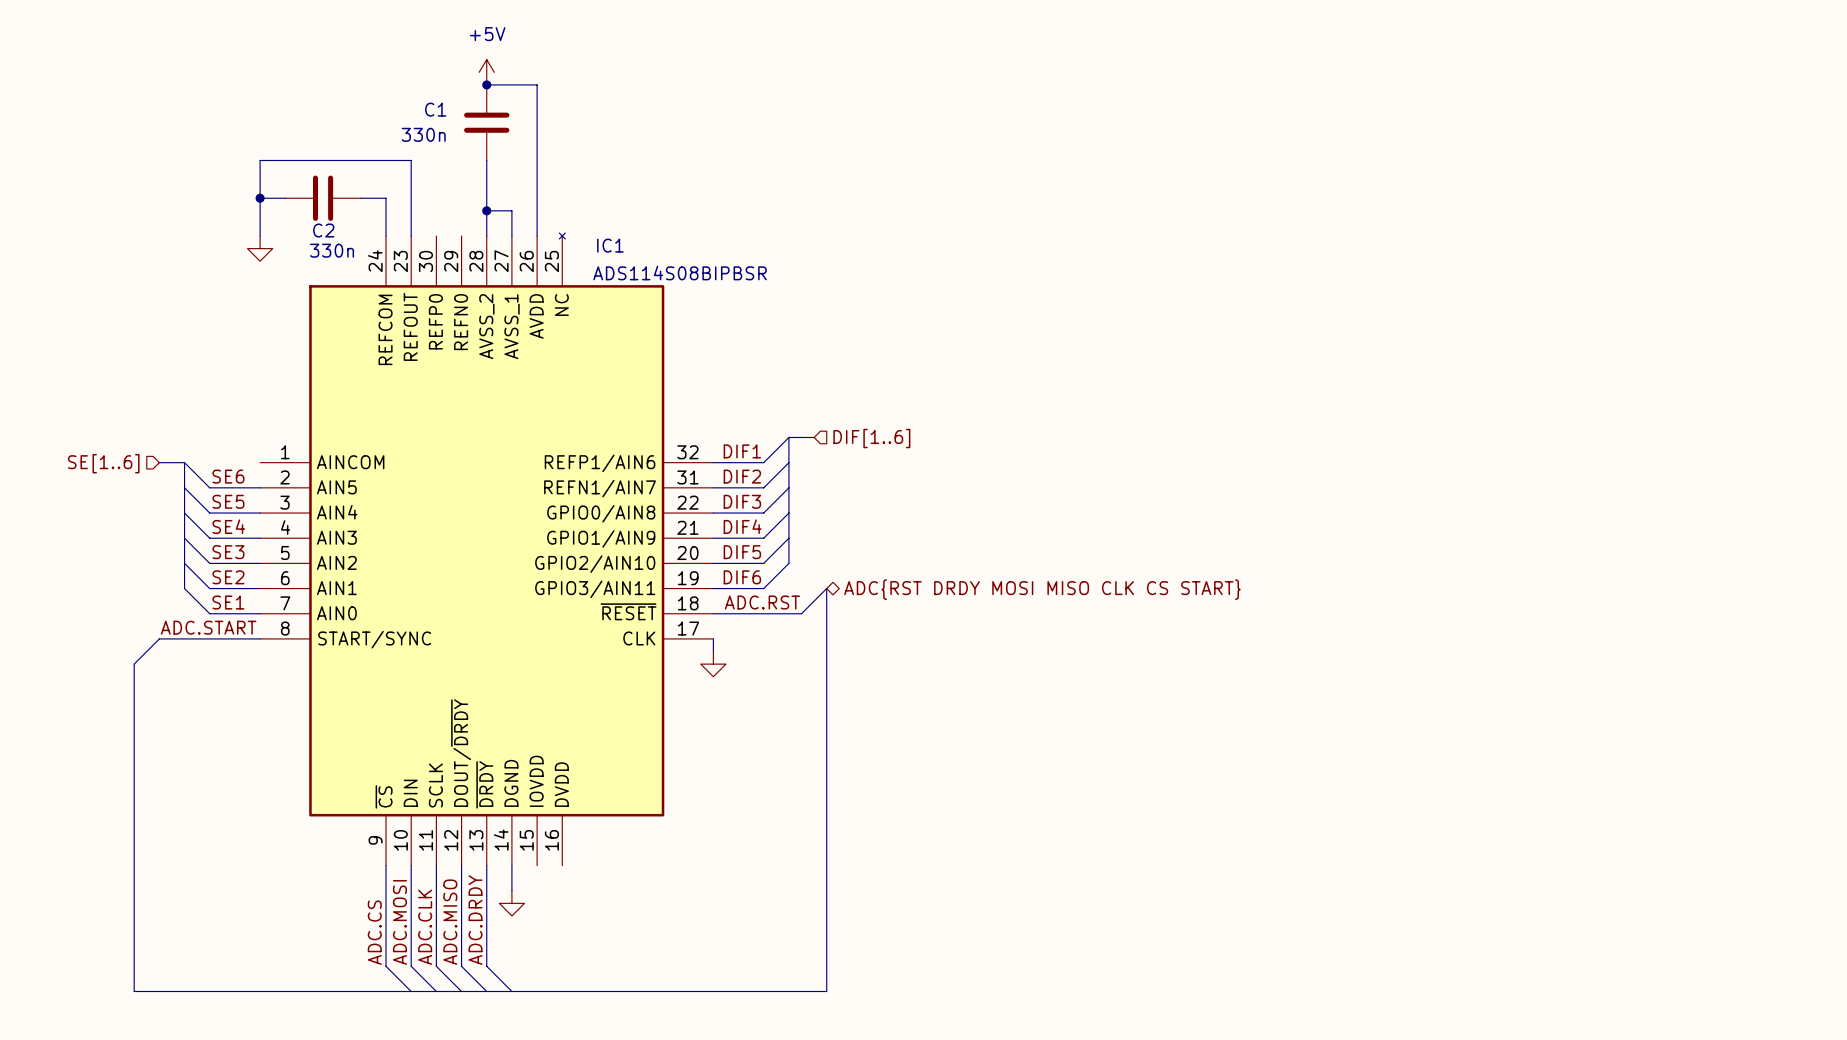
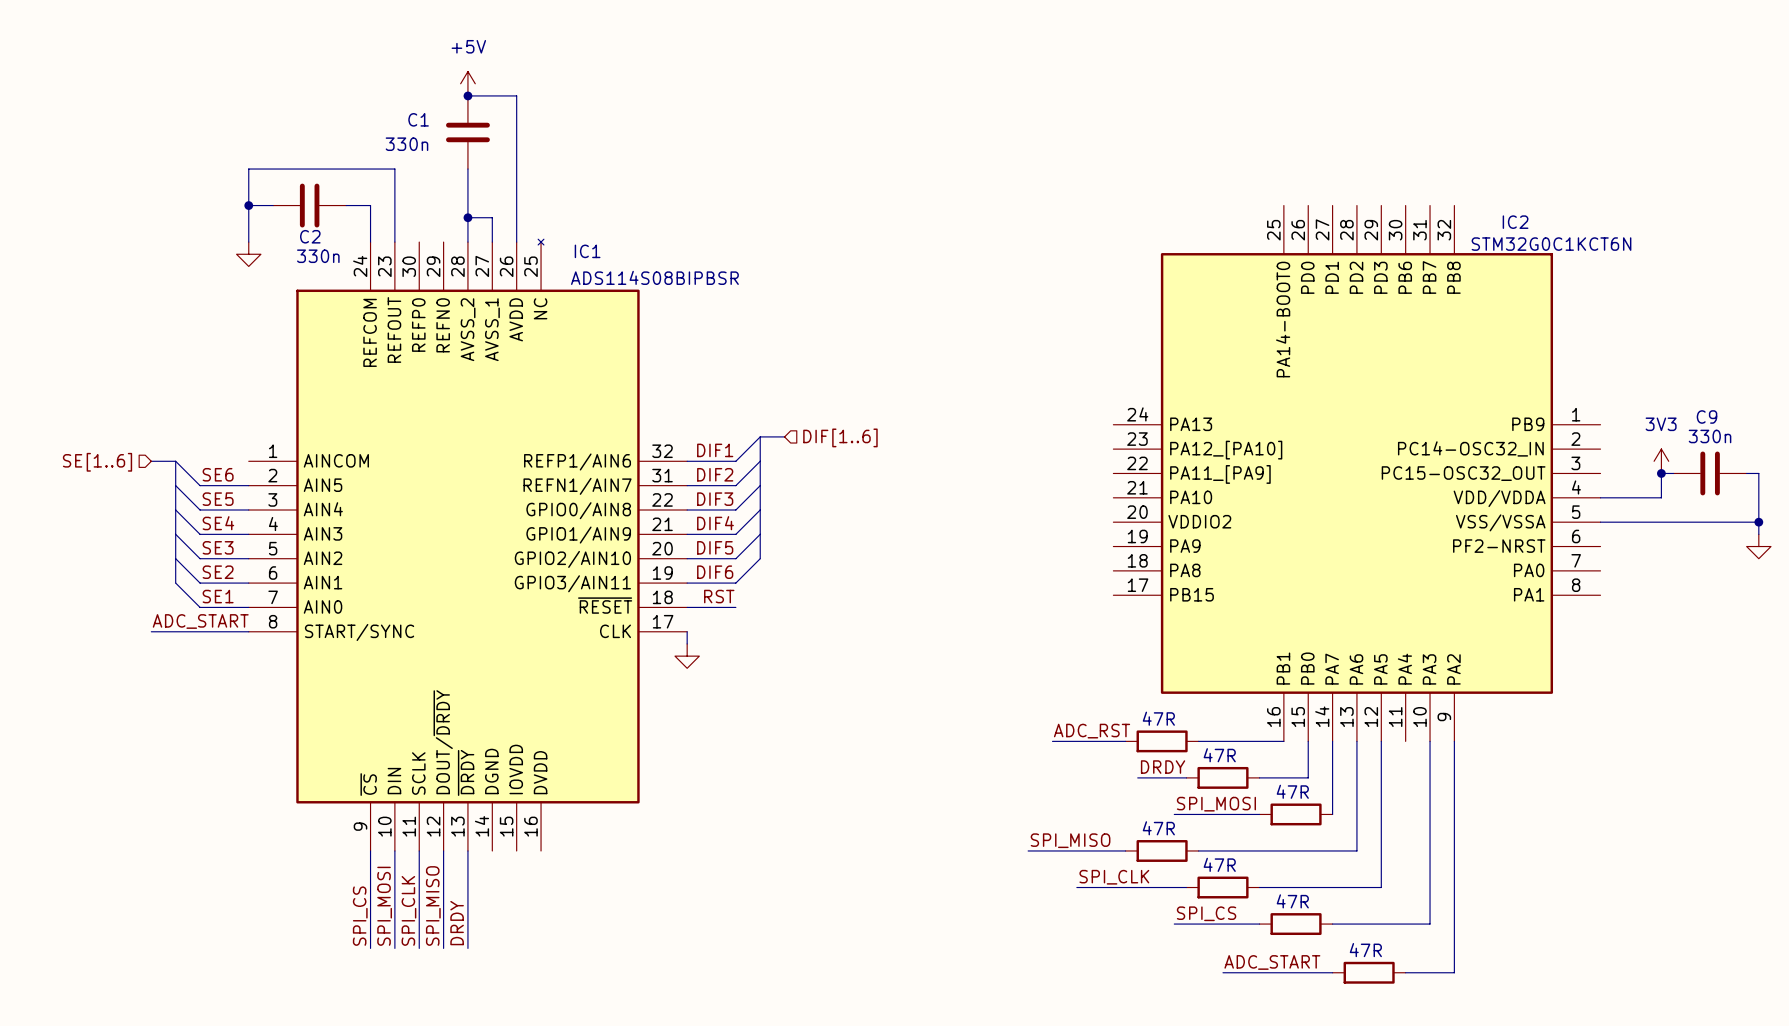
power symbol: none -> 3V3 (1661, 461)
IC2: none -> STM32G0C1KCT6N (1356, 473)
junction: none -> (1661, 473)
wire: none -> (1673, 473) (1661, 473) (1661, 497) (1600, 497)
C9: none -> 330n (1710, 473)
wire: none -> (1746, 473) (1758, 473) (1758, 534)
wire: none -> (1600, 522) (1758, 522)
junction: none -> (1758, 522)
power symbol: none -> (1758, 546)
wire: (826, 588) (801, 613) (763, 613) -> none
bus: (826, 588) (826, 991) (134, 991) (134, 664) -> none
hierarchical label: ADC{RST DRDY MOSI MISO CLK CS START} (1042, 589) -> none
label: none -> RST (719, 596)
label: ADC.RST (762, 602) -> none
label: ADC.START (208, 627) -> ADC_START (200, 621)
wire: (159, 638) (134, 664) -> none
label: none -> ADC_RST (1092, 731)
wire: none -> (1052, 741) (1125, 741)
part: none -> 47R (1162, 741)
wire: none -> (1198, 741) (1283, 741)
wire: none -> (1308, 741) (1308, 777) (1259, 777)
wire: none -> (1332, 741) (1332, 814)
wire: none -> (1356, 741) (1356, 850) (1198, 850)
wire: none -> (1381, 741) (1381, 887) (1259, 887)
wire: none -> (1430, 741) (1430, 924) (1332, 924)
wire: none -> (1454, 741) (1454, 972) (1405, 972)
label: none -> DRDY (1163, 767)
wire: none -> (1137, 777) (1186, 777)
part: none -> 47R (1222, 777)
label: none -> SPI_MOSI (1216, 804)
wire: none -> (1174, 814) (1259, 814)
part: none -> 47R (1296, 814)
label: none -> SPI_MISO (1070, 840)
wire: (511, 865) (511, 890) -> none
wire: none -> (1028, 850) (1125, 850)
part: none -> 47R (1162, 850)
label: none -> SPI_CLK (1114, 877)
power symbol: (511, 903) -> none
wire: none -> (1076, 887) (1186, 887)
part: none -> 47R (1222, 887)
label: ADC.DRDY (475, 920) -> DRDY (457, 923)
label: ADC.MOSI (399, 922) -> SPI_MOSI (384, 906)
label: ADC.MISO (450, 922) -> SPI_MISO (433, 905)
label: ADC.CLK (425, 927) -> SPI_CLK (408, 910)
label: none -> SPI_CS (1206, 913)
label: ADC.CS (374, 932) -> SPI_CS (360, 916)
wire: none -> (1174, 924) (1259, 924)
part: none -> 47R (1296, 924)
wire: (386, 966) (411, 991) -> none
wire: (411, 966) (436, 991) -> none
wire: (436, 966) (461, 991) -> none
wire: (461, 966) (486, 991) -> none
wire: (486, 966) (511, 991) -> none
label: none -> ADC_START (1272, 962)
wire: none -> (1222, 972) (1332, 972)
part: none -> 47R (1369, 972)

